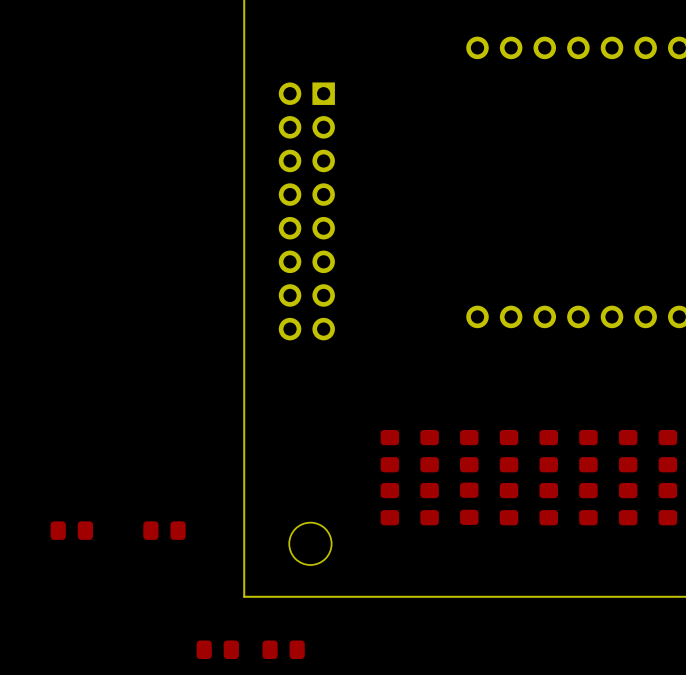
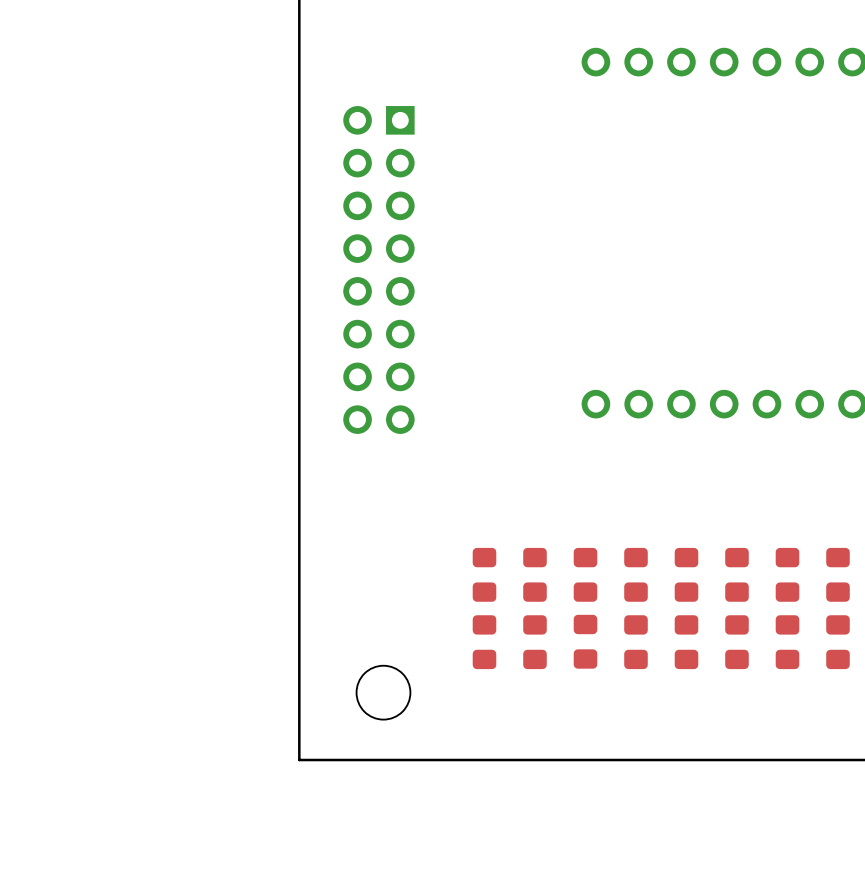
part: (71, 530) -> none
part: (164, 530) -> none
part: (217, 649) -> none
part: (283, 649) -> none

